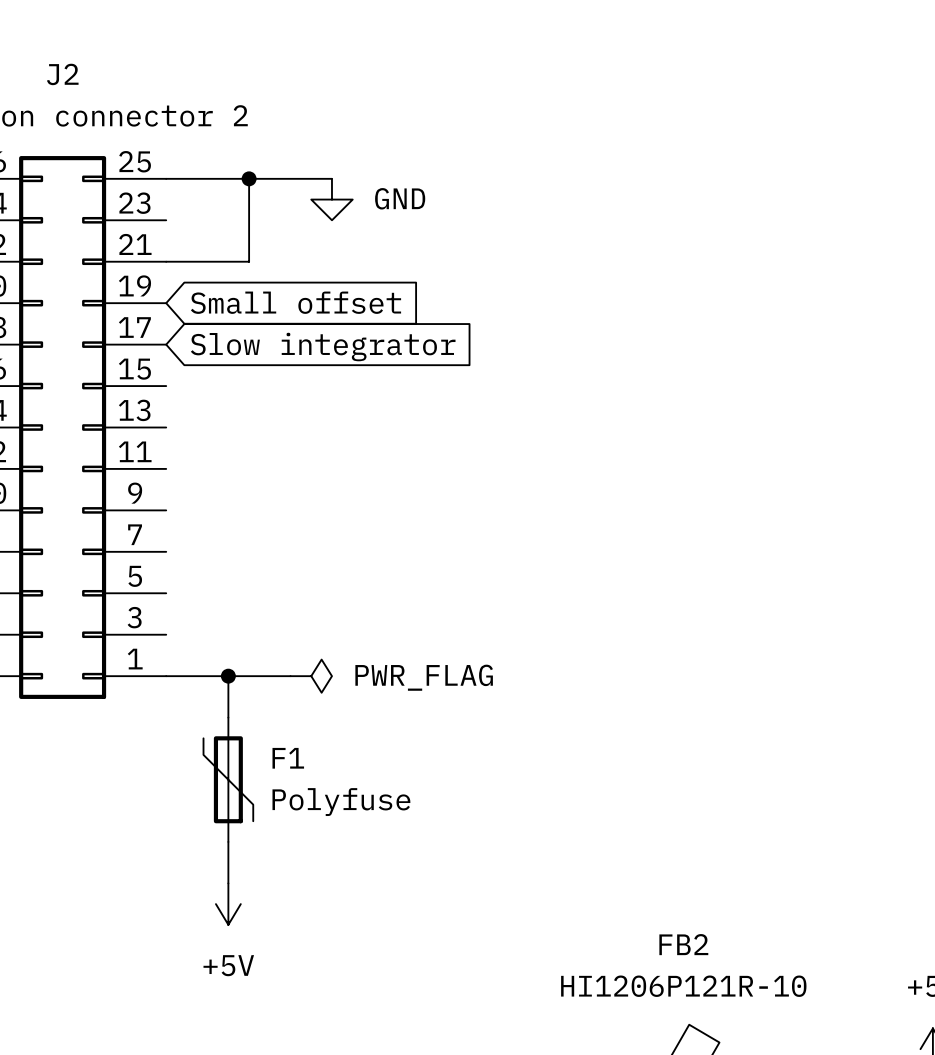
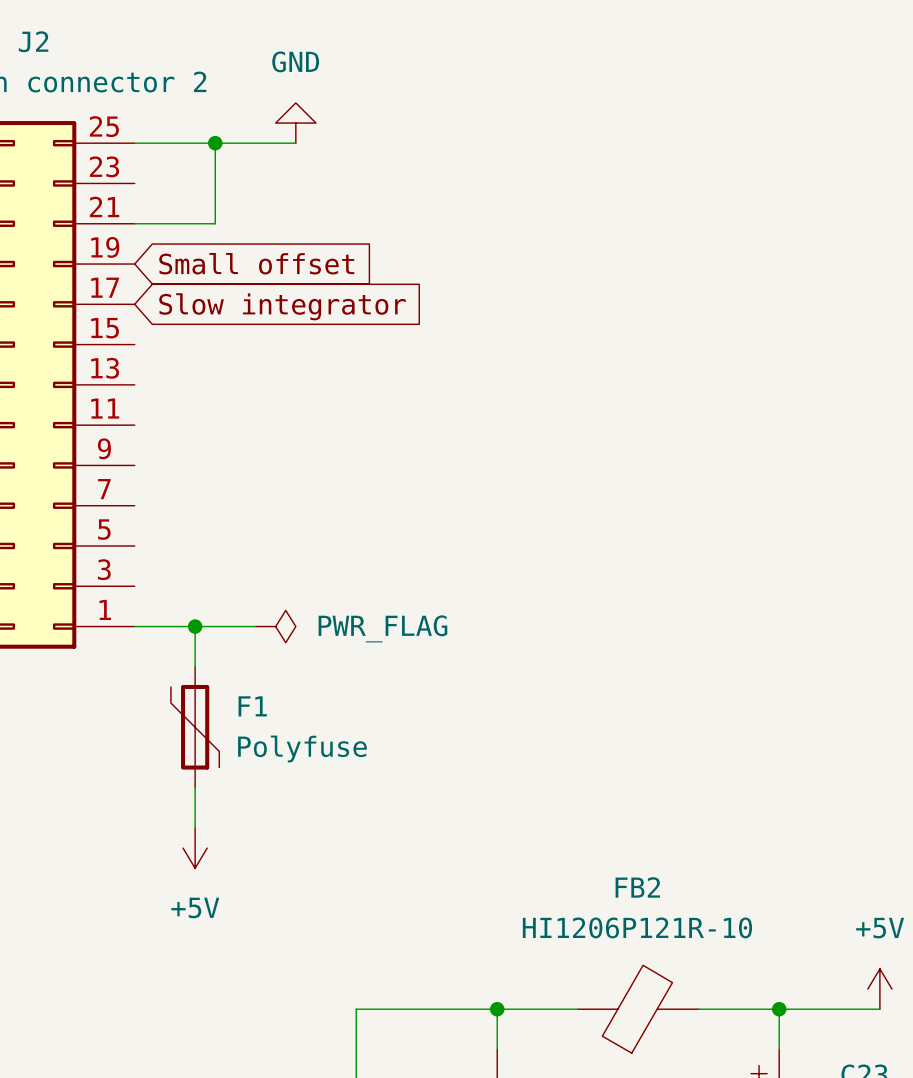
power symbol text position: GND (400, 198) -> GND (295, 61)
power symbol rotation: 0° (331, 199) -> 180° (295, 123)
power symbol position: GND (331, 199) -> GND (295, 123)

